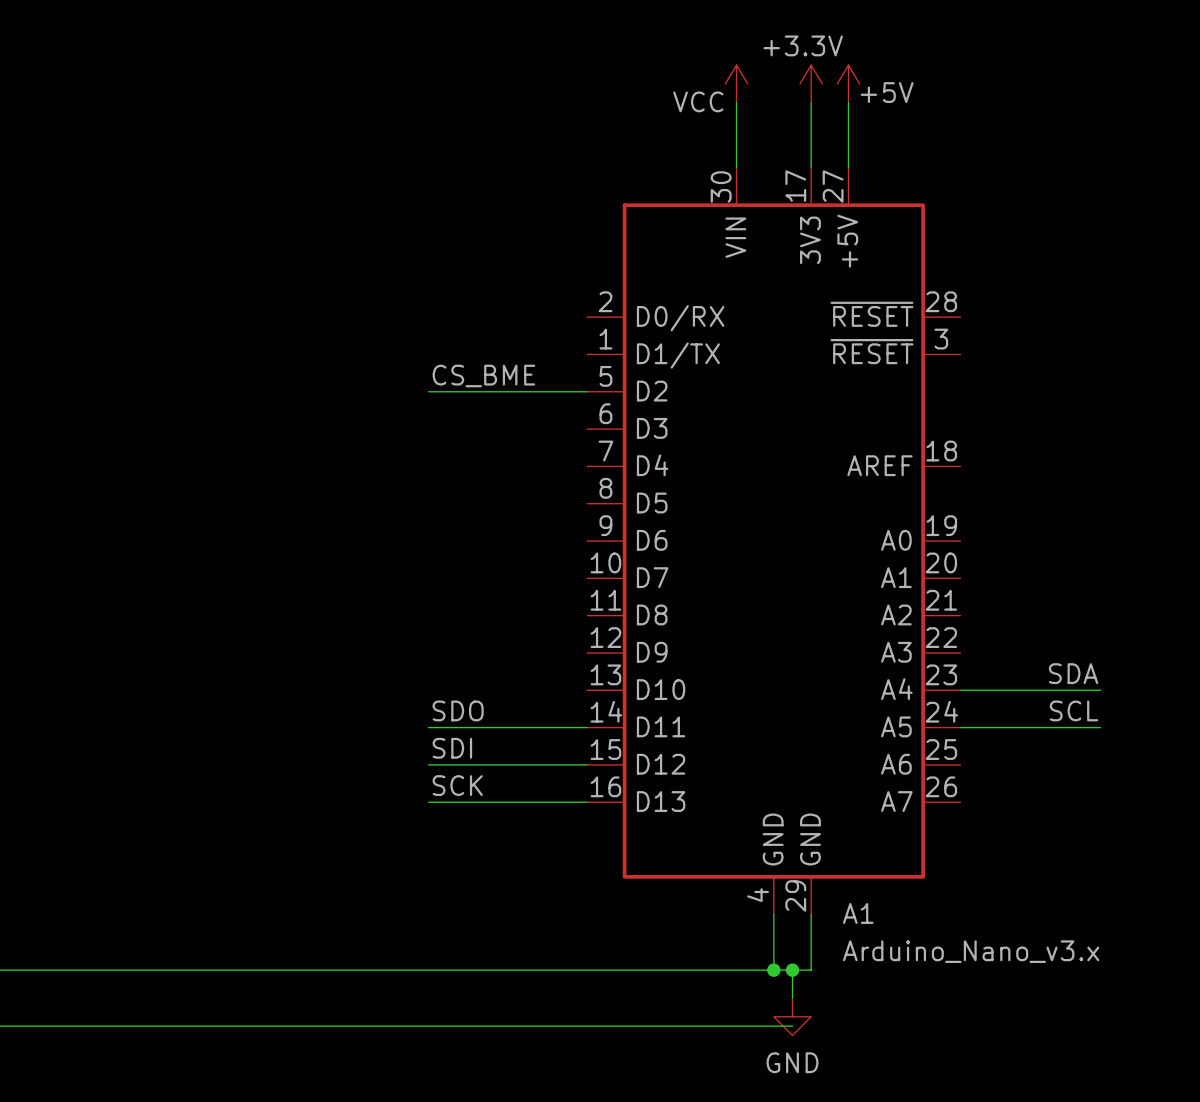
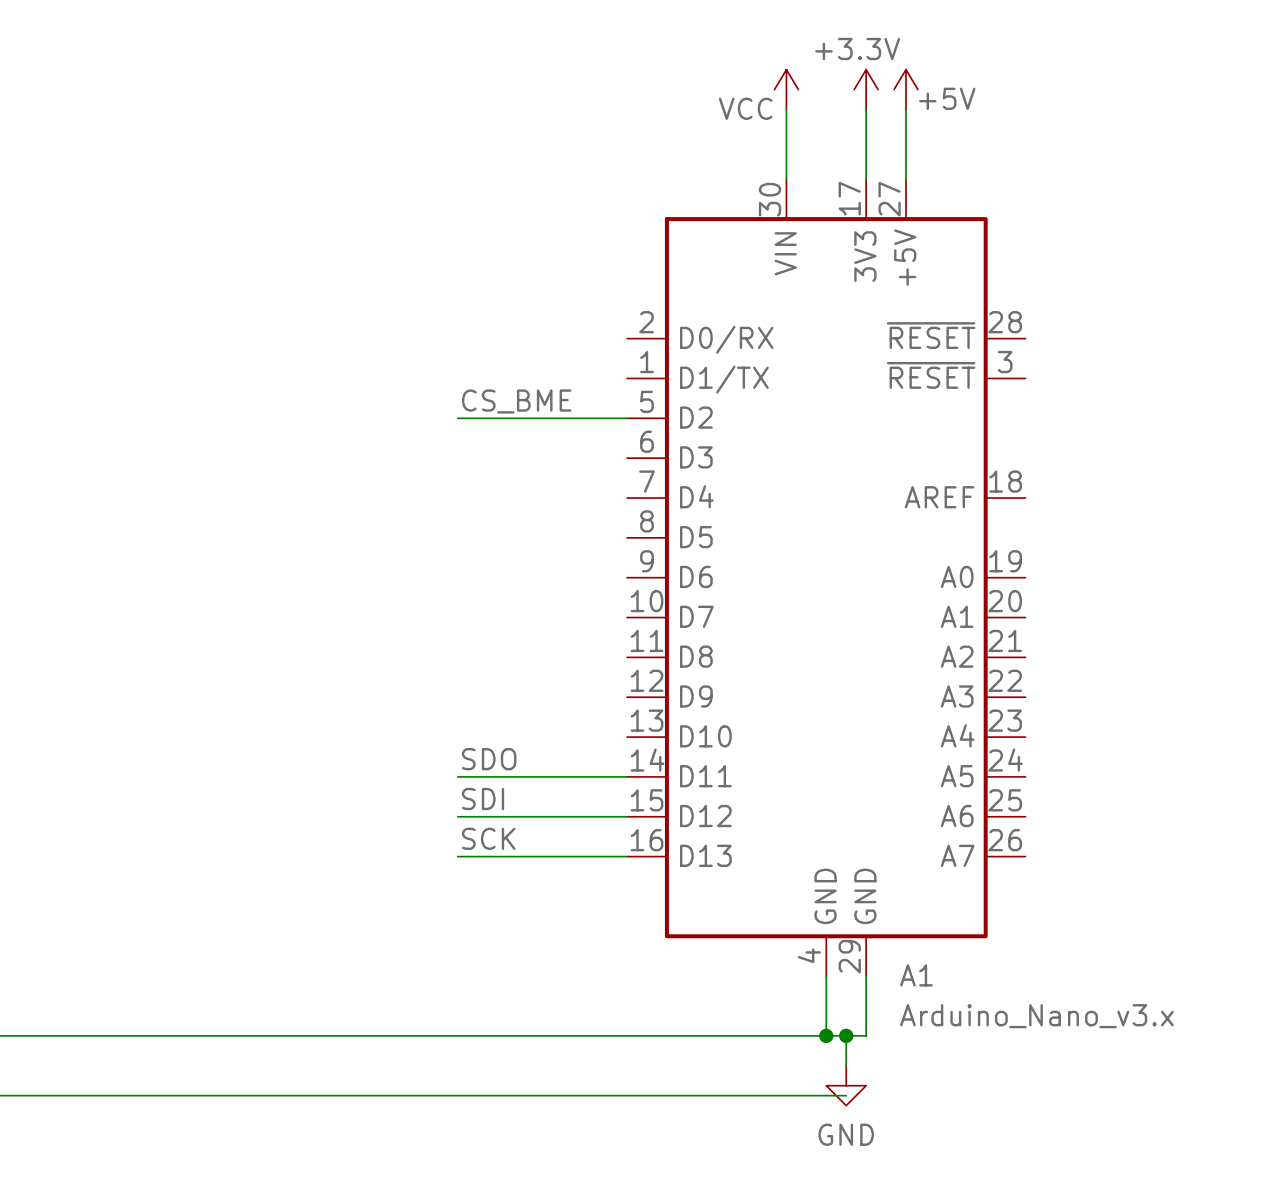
label: SDA (1073, 673) -> none
wire: (960, 690) (1100, 690) -> none
label: SCL (1074, 710) -> none
wire: (960, 727) (1100, 727) -> none

